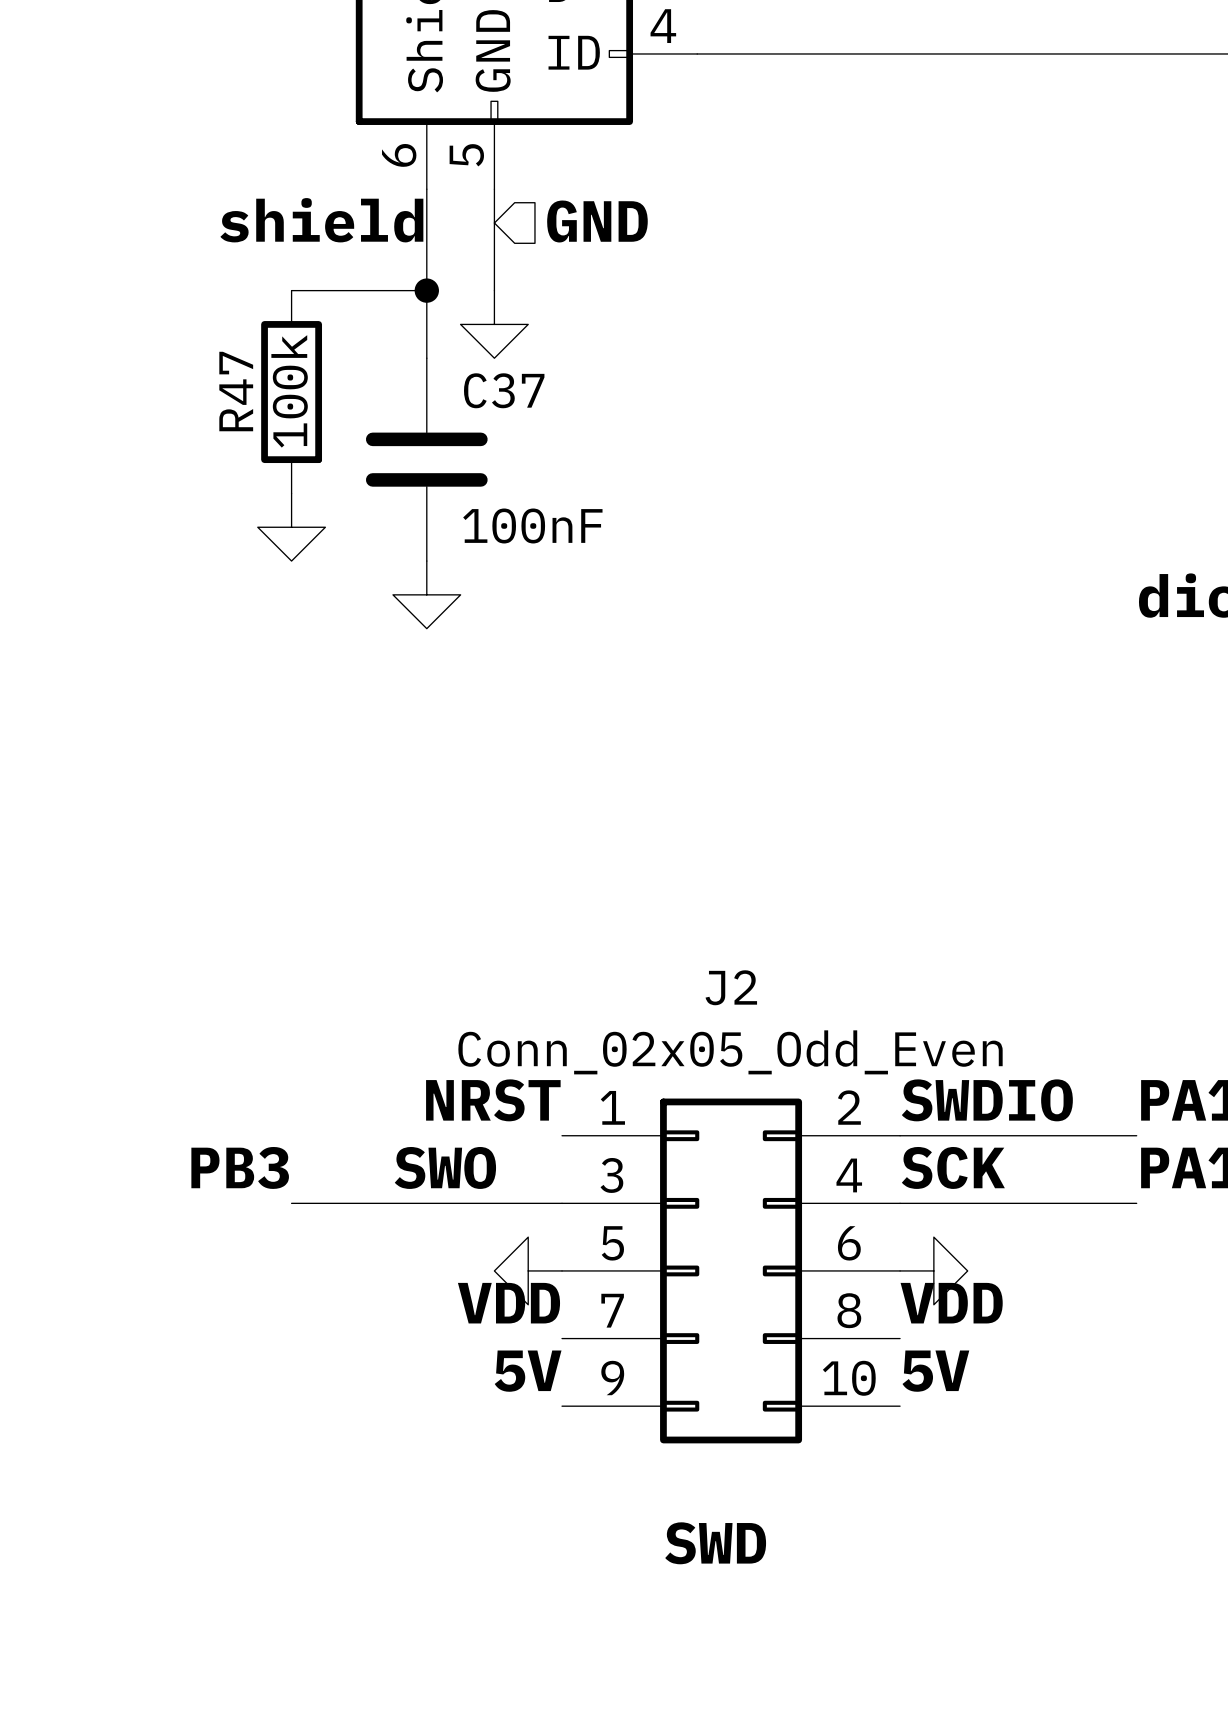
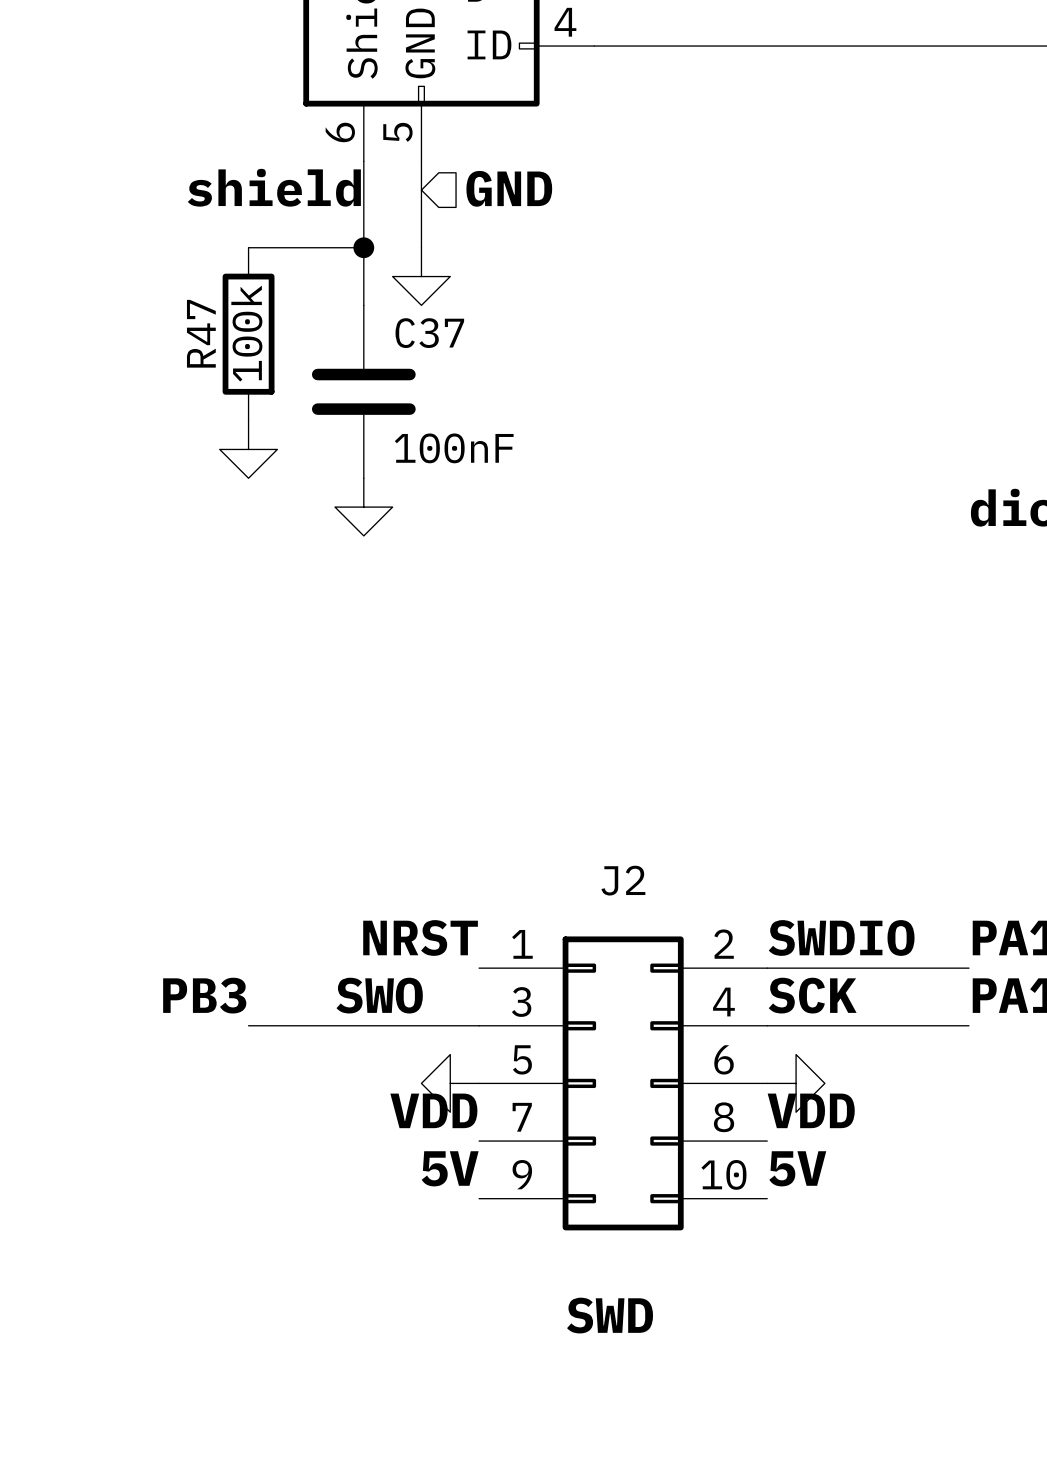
J2 name position: J2 (731, 987) -> J2 (623, 880)
J2 value: Conn_02x05_Odd_Even (730, 1052) -> none

